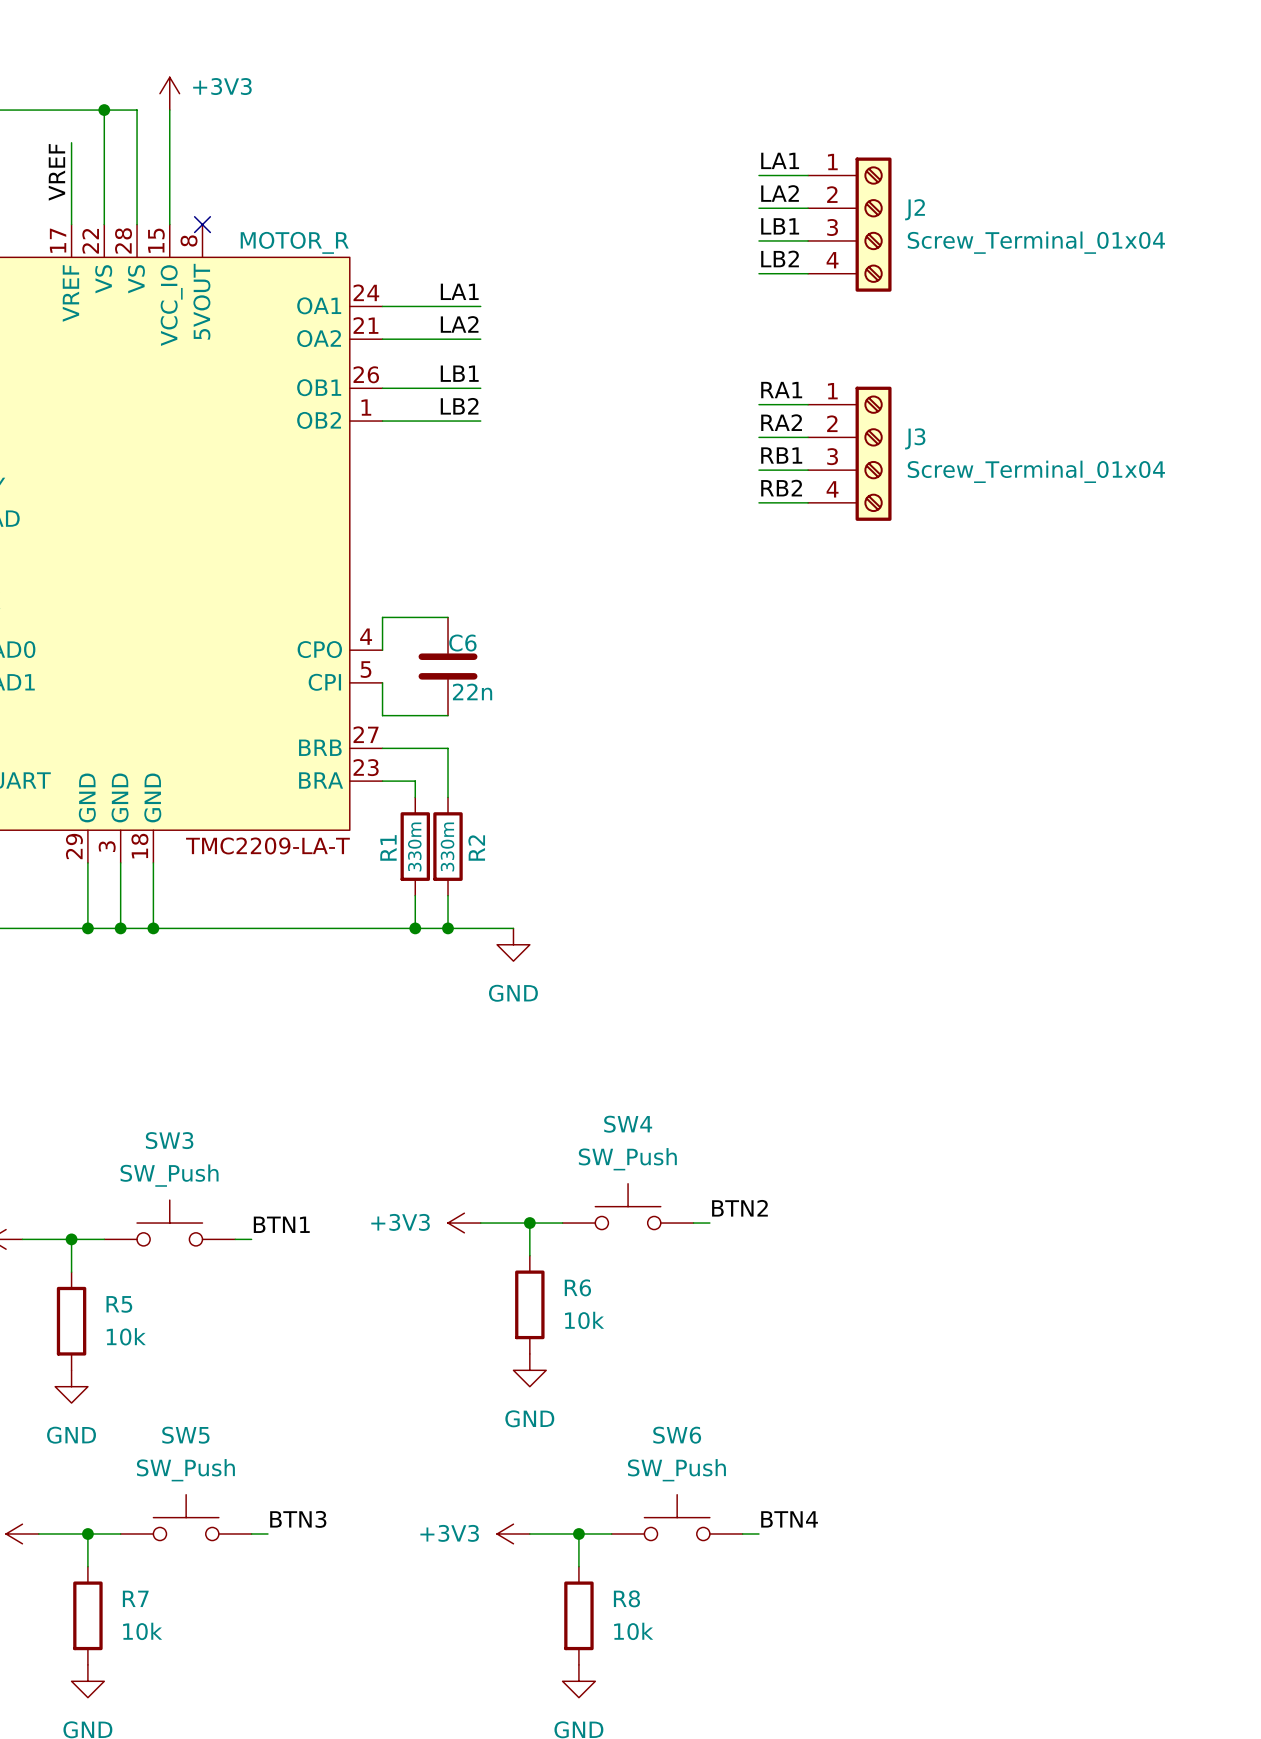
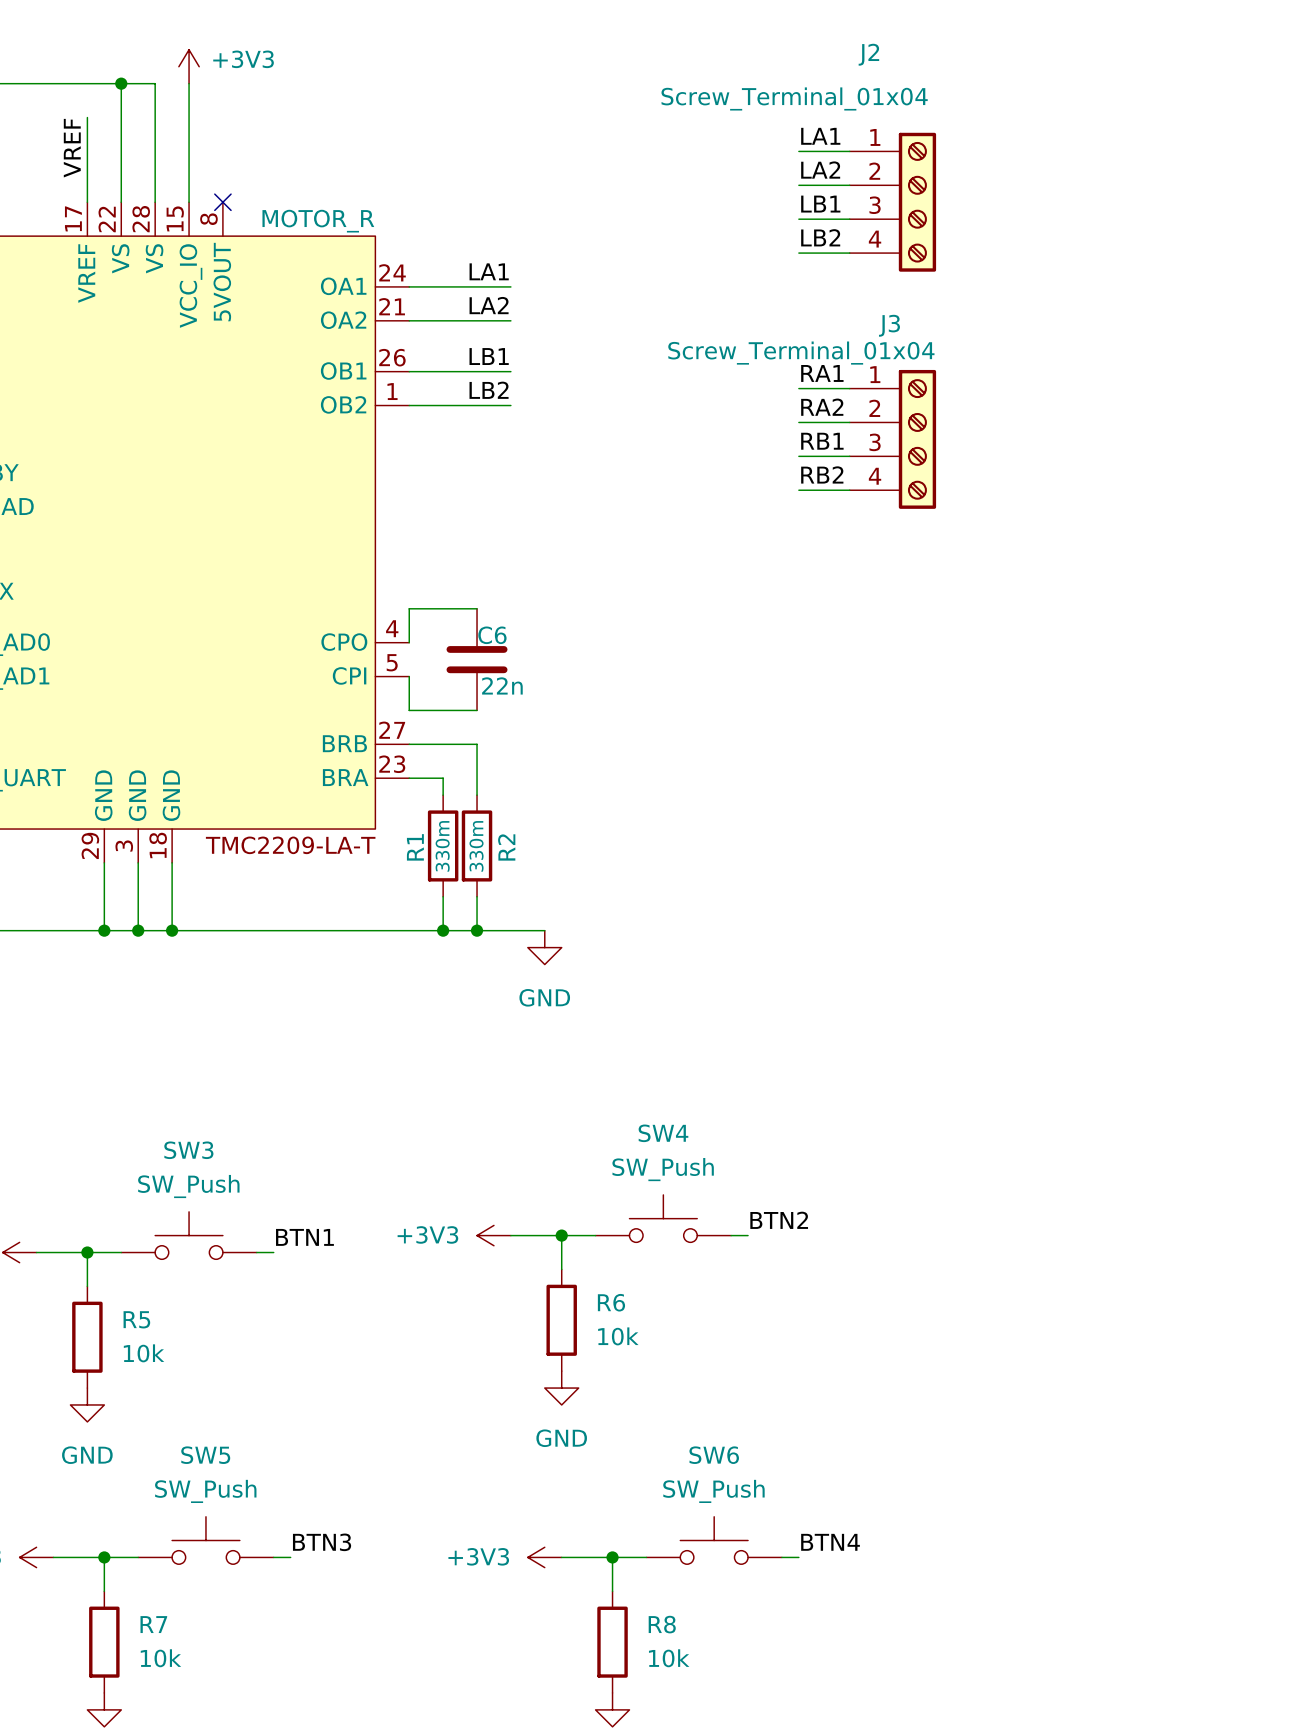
J2 name position: J2 (915, 209) -> J2 (868, 54)
J2 value position: Screw_Terminal_01x04 (1036, 242) -> Screw_Terminal_01x04 (794, 98)
J3 name position: J3 (915, 438) -> J3 (889, 325)
J3 value position: Screw_Terminal_01x04 (1036, 471) -> Screw_Terminal_01x04 (801, 353)

